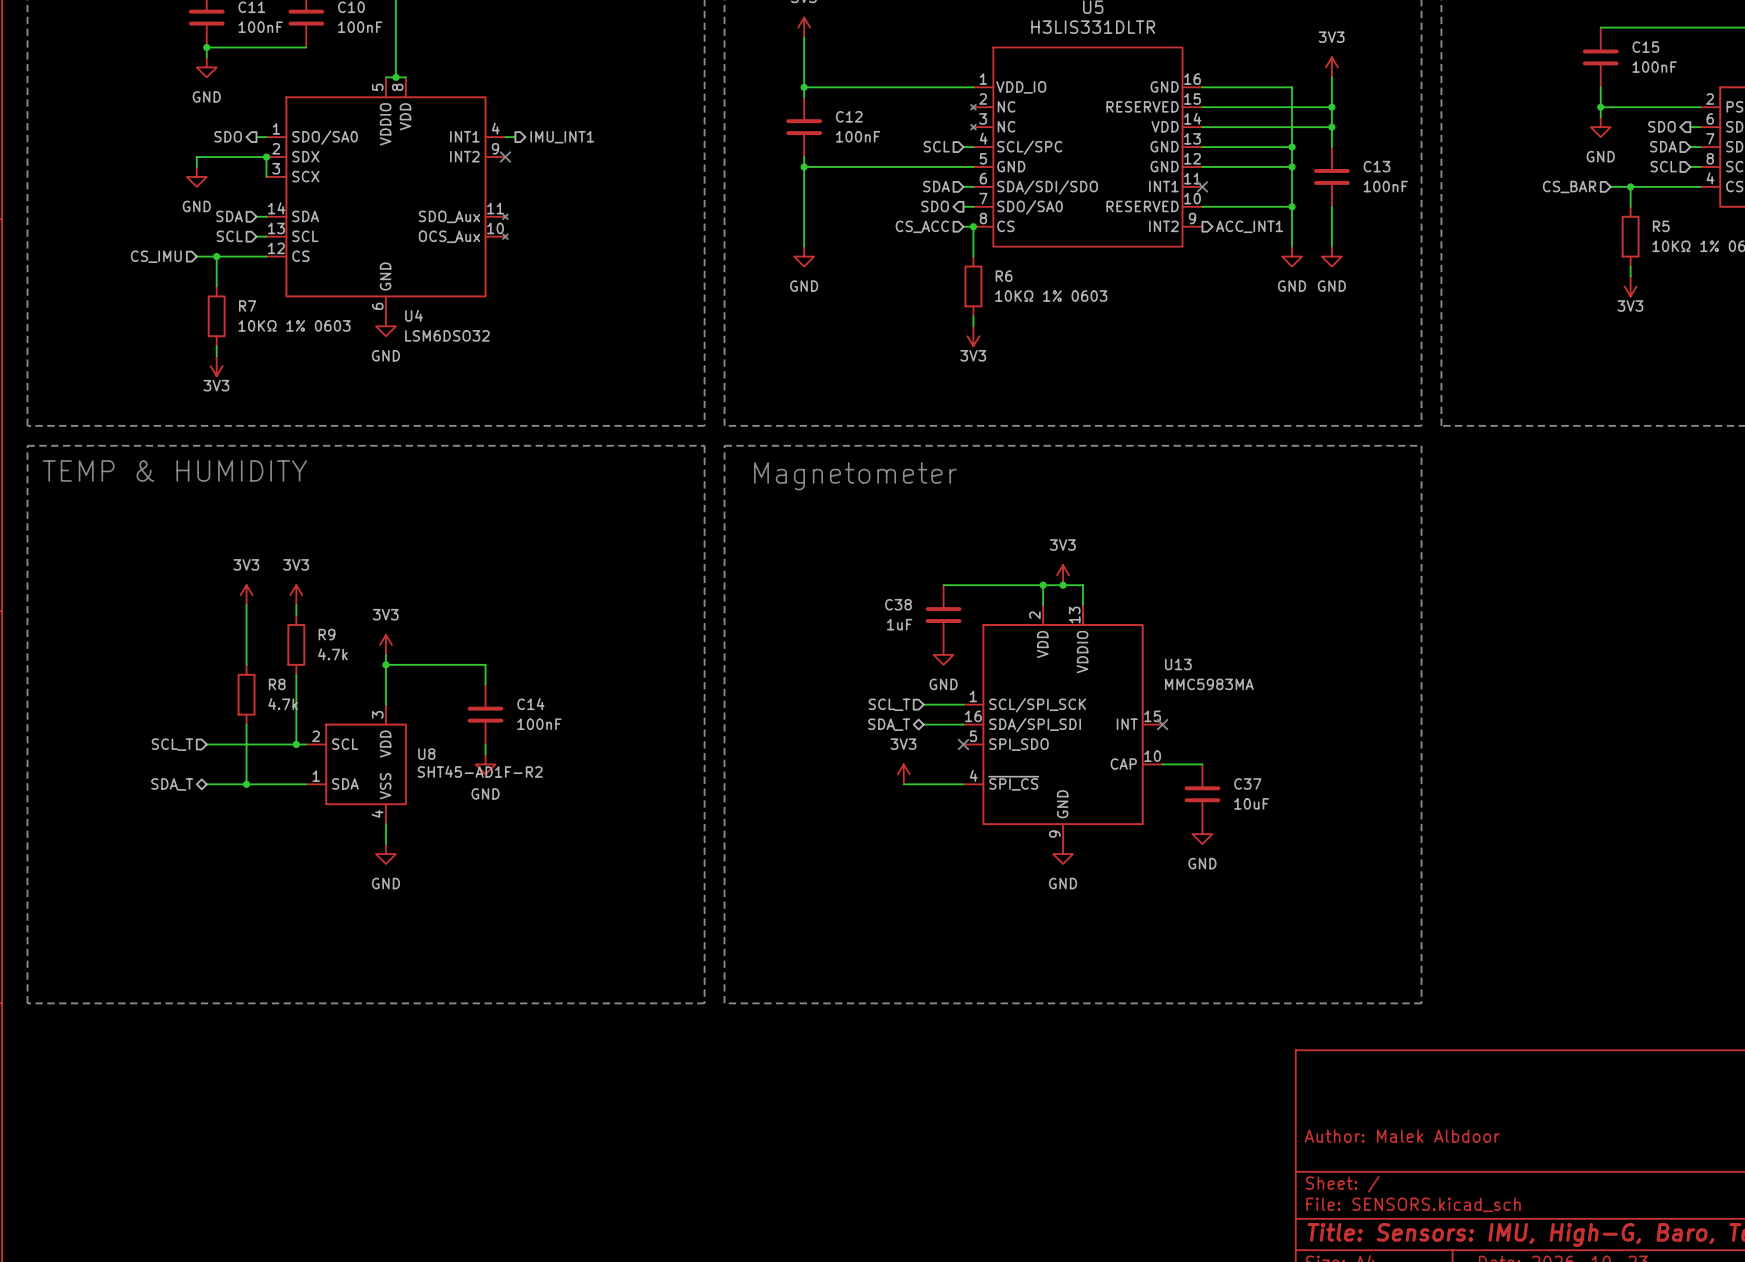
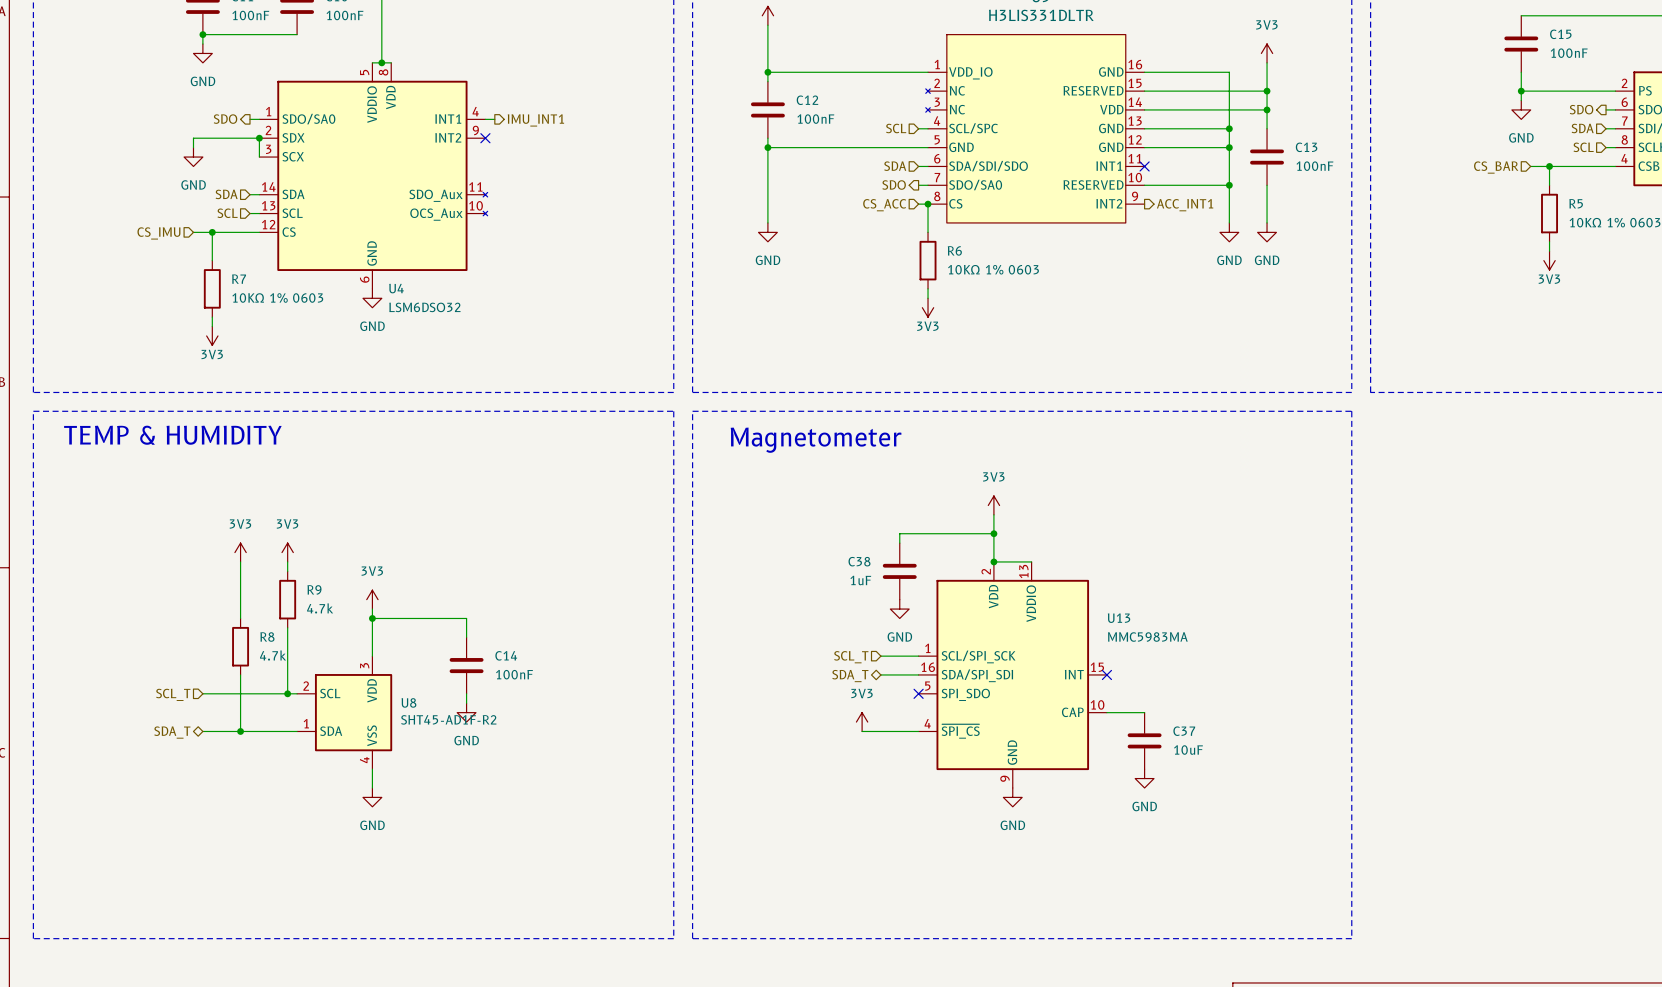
wire: none -> (993, 514) (993, 543)
junction: none -> (993, 533)
power symbol position: 3V3 (1063, 575) -> 3V3 (993, 505)
wire: (943, 585) (1082, 585) (1082, 605) -> (899, 543) (899, 533) (993, 533)
junction: (1043, 585) -> none
junction: (1063, 585) -> none
wire: none -> (993, 561) (1031, 561)
junction: none -> (993, 561)

